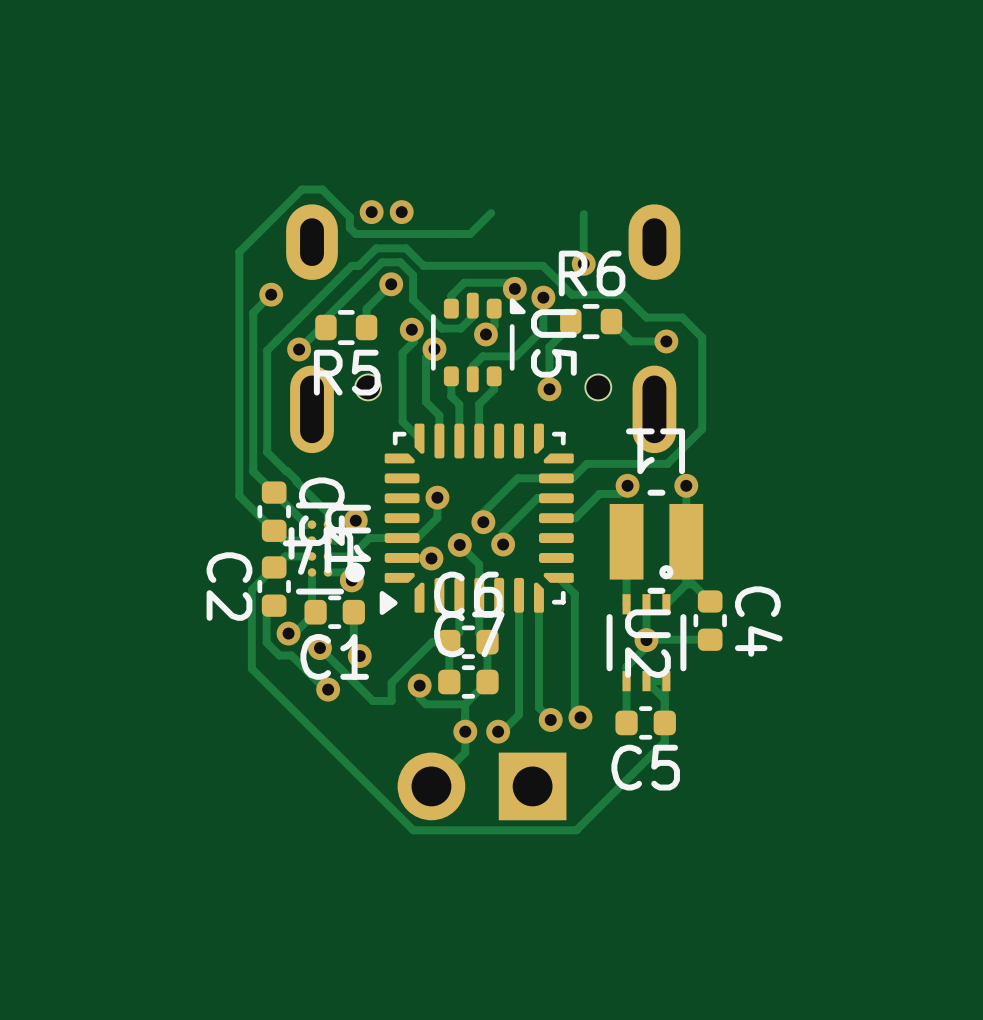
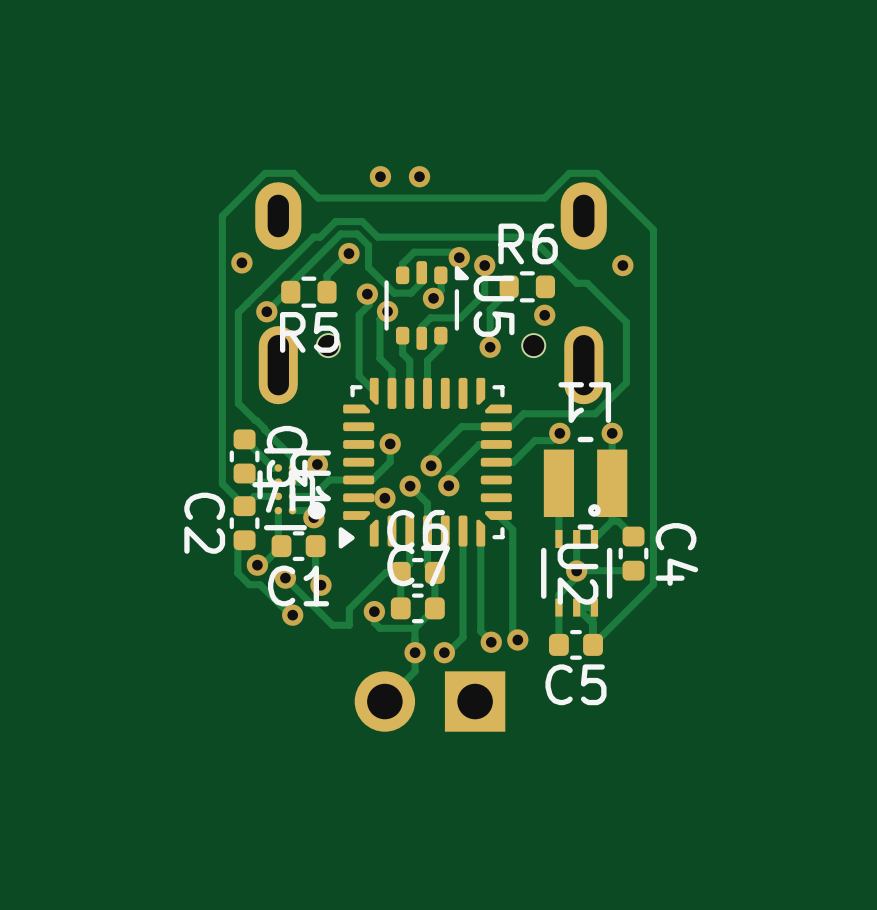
track: (297, 194) (301, 189) (322, 189) (349, 217) (349, 227) (355, 234) (470, 233) (491, 213) -> none
via: none -> (380, 176)
via: none -> (419, 176)
via: (371, 212) -> none
via: (401, 212) -> none
track: (583, 214) (583, 263) -> none
track: (249, 242) (239, 252) (239, 495) (274, 530) -> (222, 216) (222, 483) (244, 506)
via: (583, 263) -> none
track: (542, 265) (571, 294) (623, 294) -> (484, 237) (530, 237) (556, 262)
track: (271, 294) (253, 312) (253, 471) (274, 492) -> none
via: none -> (622, 265)
track: (658, 317) (682, 317) (702, 337) (702, 361) -> (587, 283) (626, 322)
track: (611, 321) (631, 341) (666, 341) -> none
via: (666, 341) -> none
via: none -> (544, 315)
track: (274, 567) (251, 589) (251, 668) (413, 830) (576, 830) (664, 741) (664, 722) -> (265, 173) (293, 173) (318, 198) (544, 198) (569, 173) (597, 173) (653, 229) (653, 584) (593, 644)

